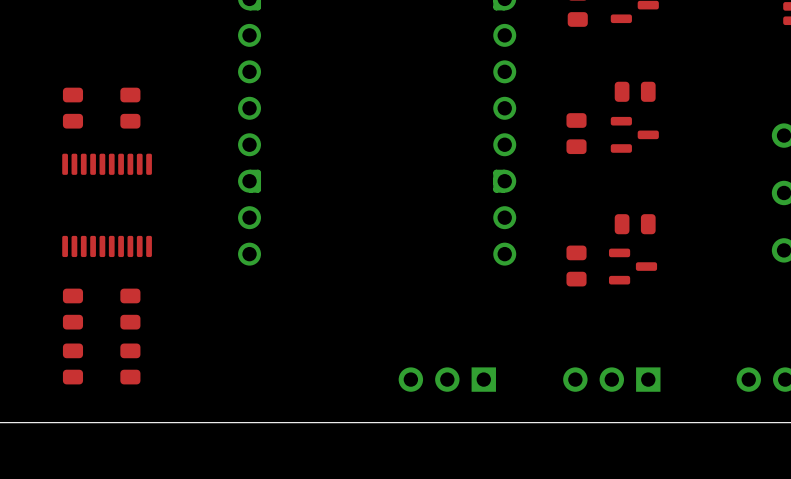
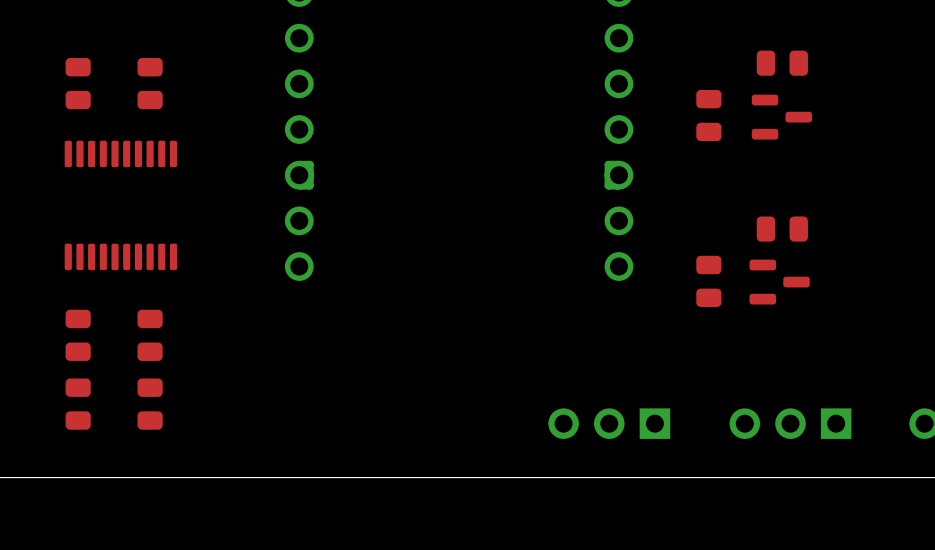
part position: (447, 379) -> (609, 423)
part position: (611, 379) -> (790, 423)

